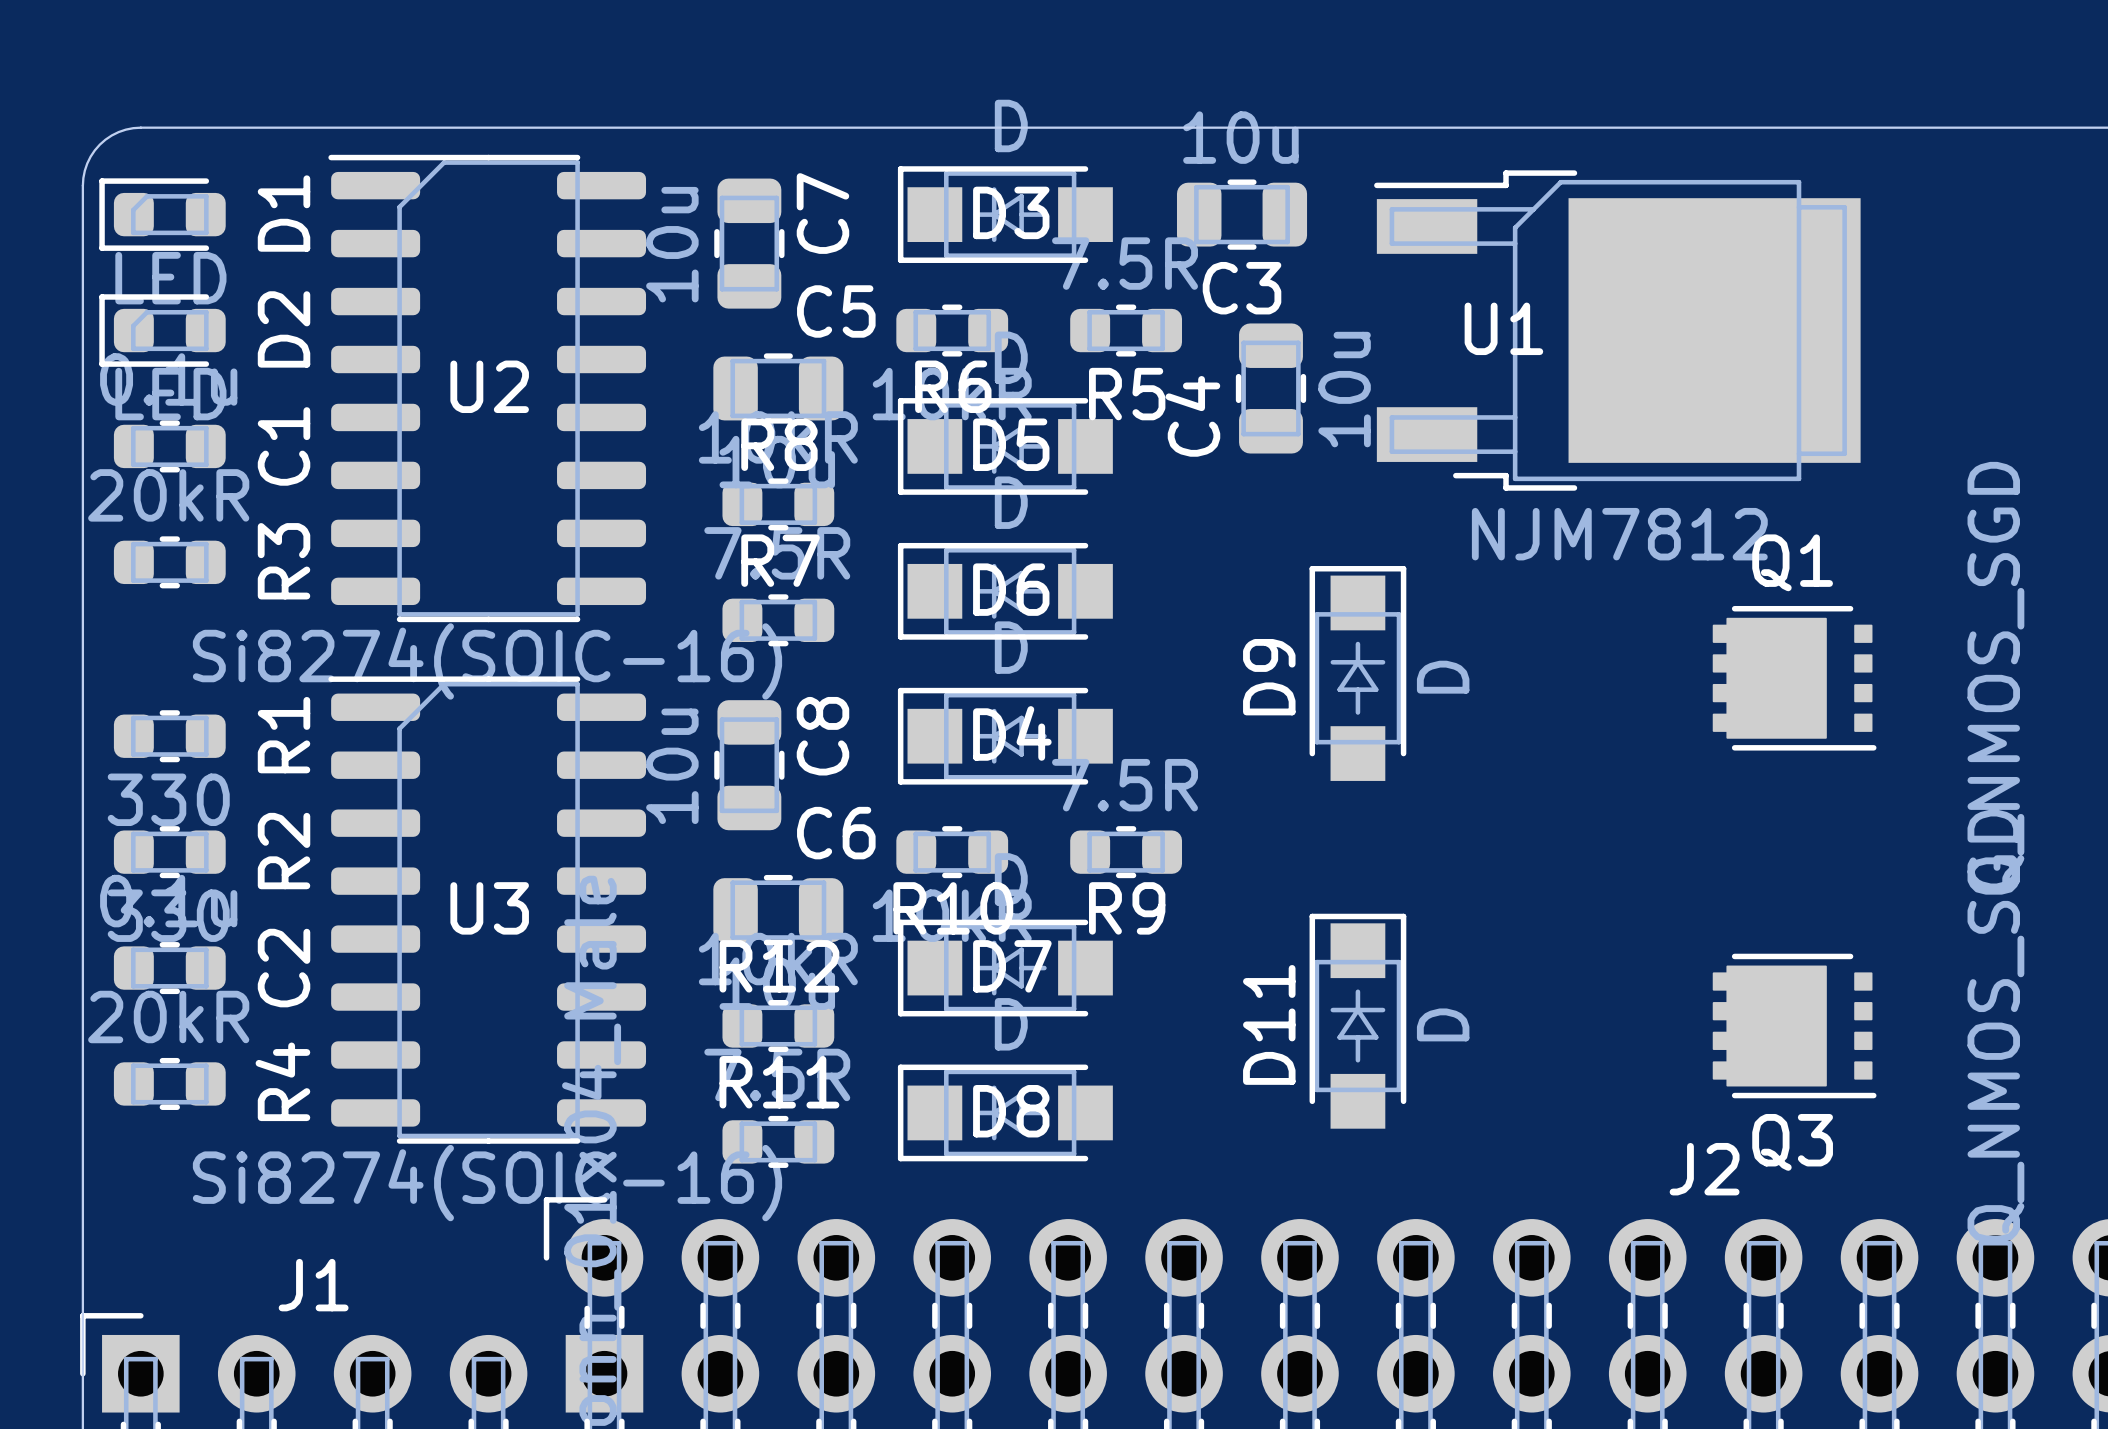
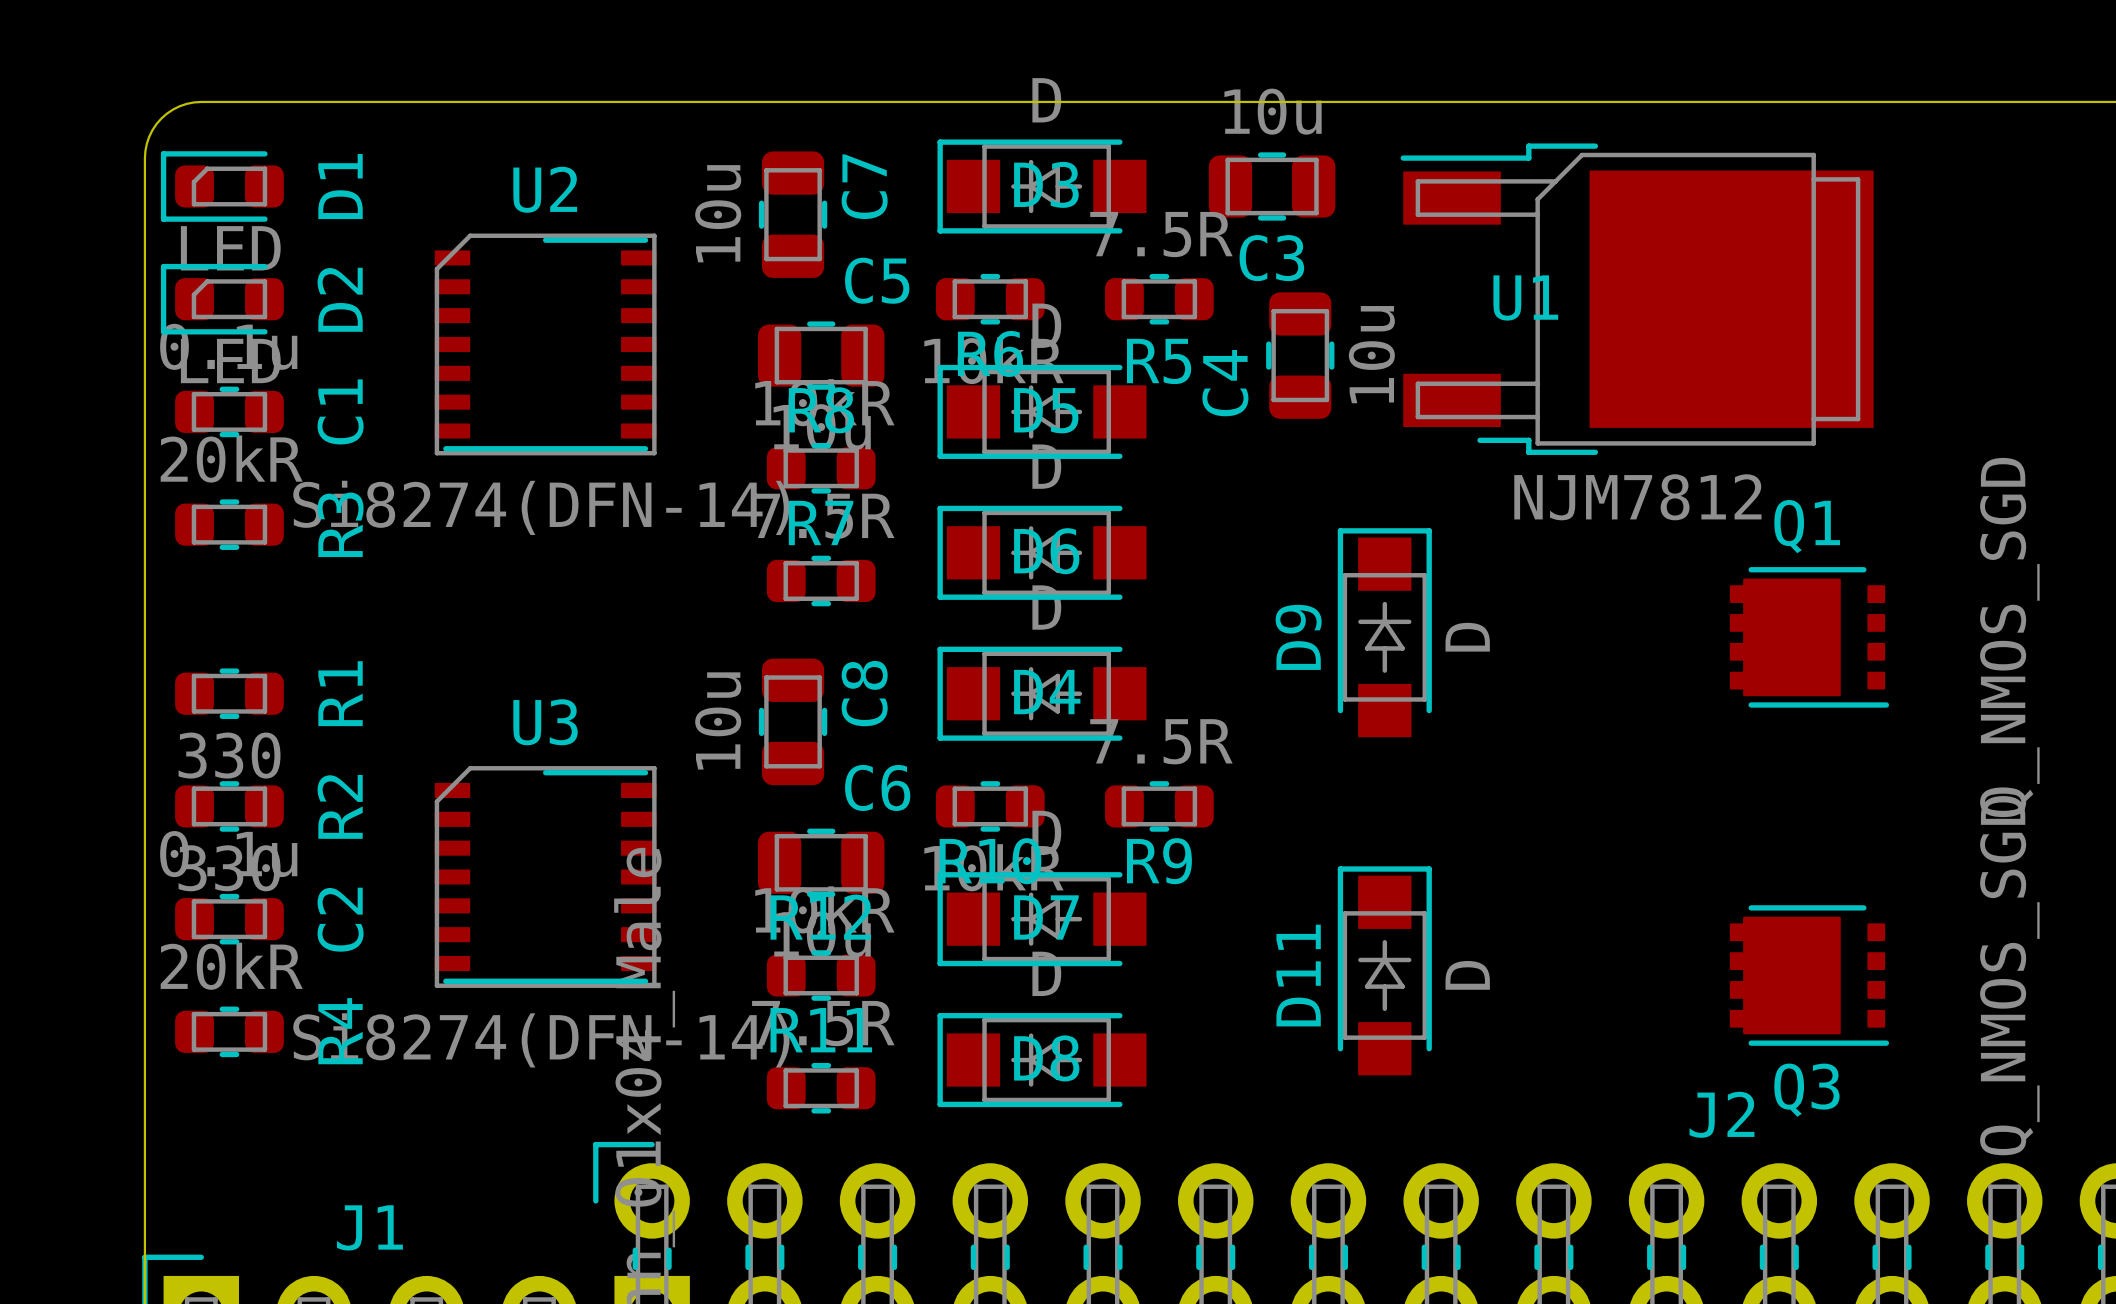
U2 footprint: [328, 154, 647, 623] -> [434, 233, 657, 456]
U2 name position: U2 (489, 386) -> U2 (545, 189)
U2 value: Si8274(SOIC-16) (487, 661) -> Si8274(DFN-14) (541, 507)
U3 footprint: [328, 676, 647, 1144] -> [434, 766, 657, 988]
U3 name position: U3 (489, 908) -> U3 (545, 722)
U3 value: Si8274(SOIC-16) (487, 1183) -> Si8274(DFN-14) (541, 1040)

